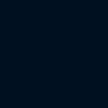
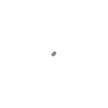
line: none -> (54, 53) (53, 54)

